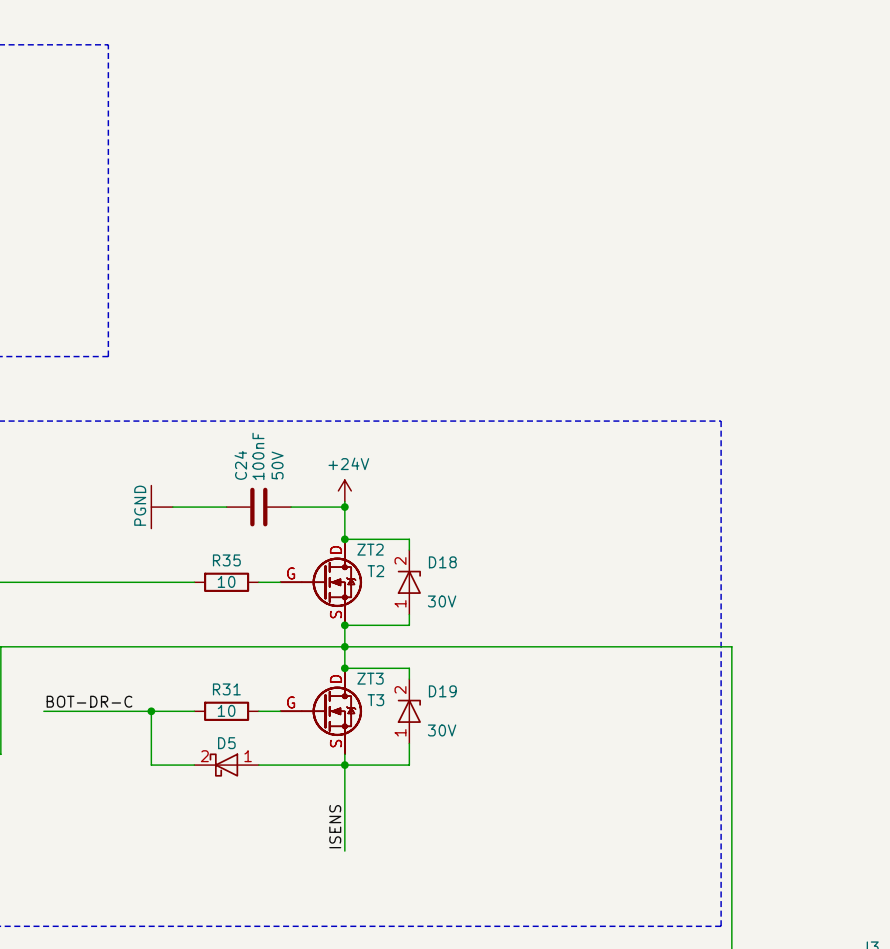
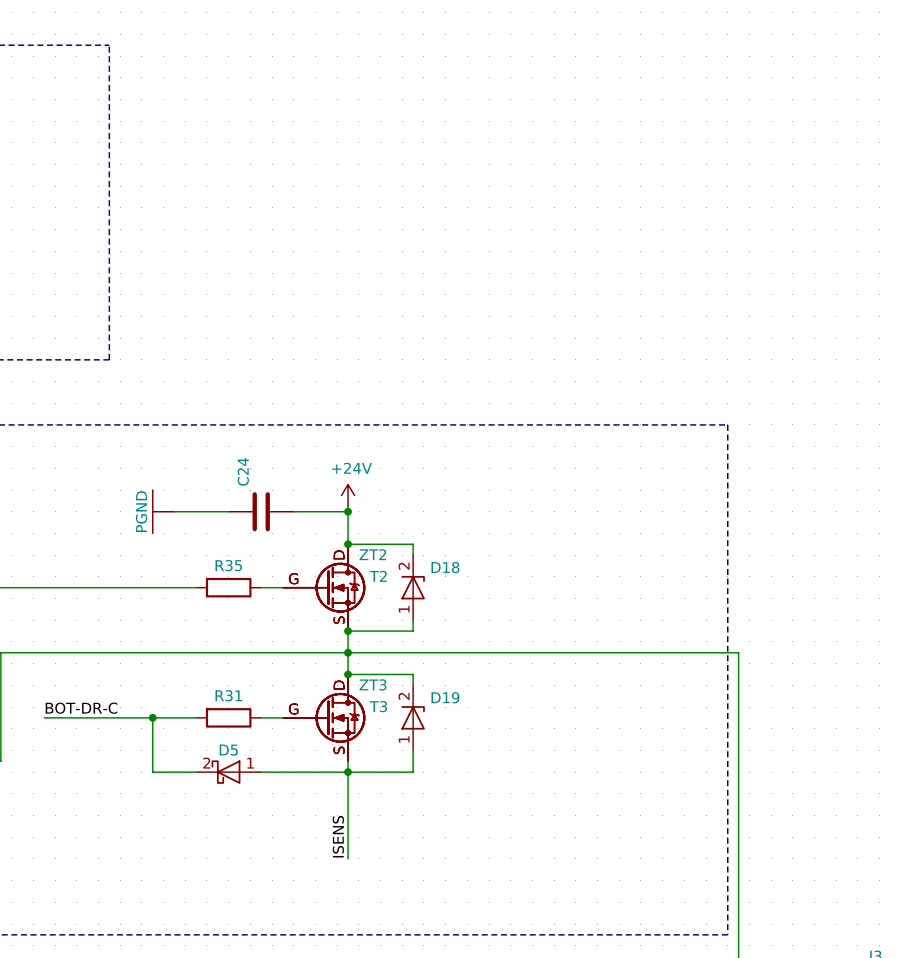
C24 text: 100nF (258, 456) -> none
C24 text: 50V (277, 465) -> none
R35 text: 10 (226, 581) -> none
D18 text: 30V (442, 601) -> none
R31 text: 10 (226, 710) -> none
D19 text: 30V (442, 730) -> none

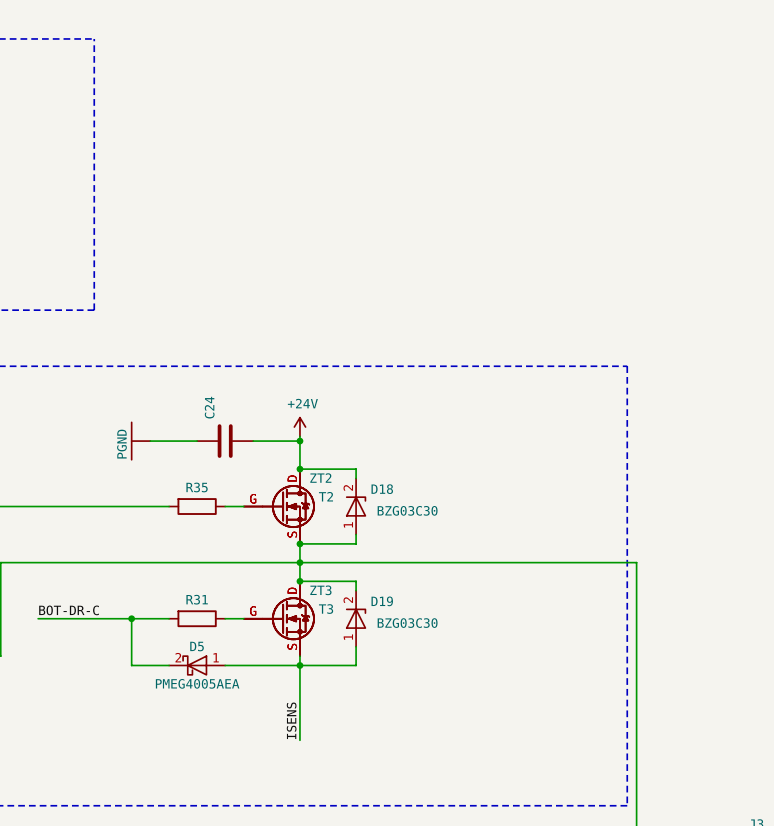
D18 value: none -> BZG03C30 (407, 510)
D19 value: none -> BZG03C30 (407, 623)
D5 value: none -> PMEG4005AEA (197, 683)

